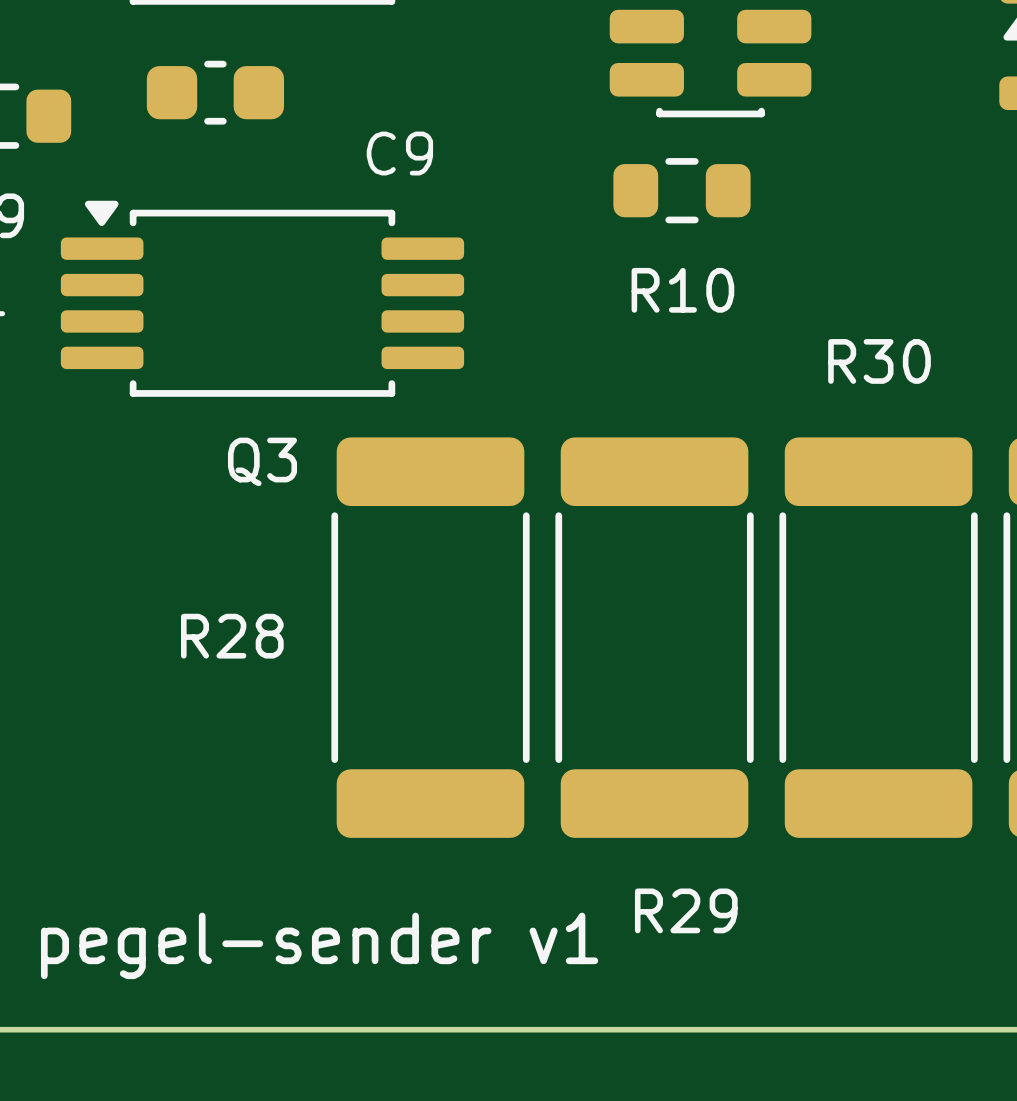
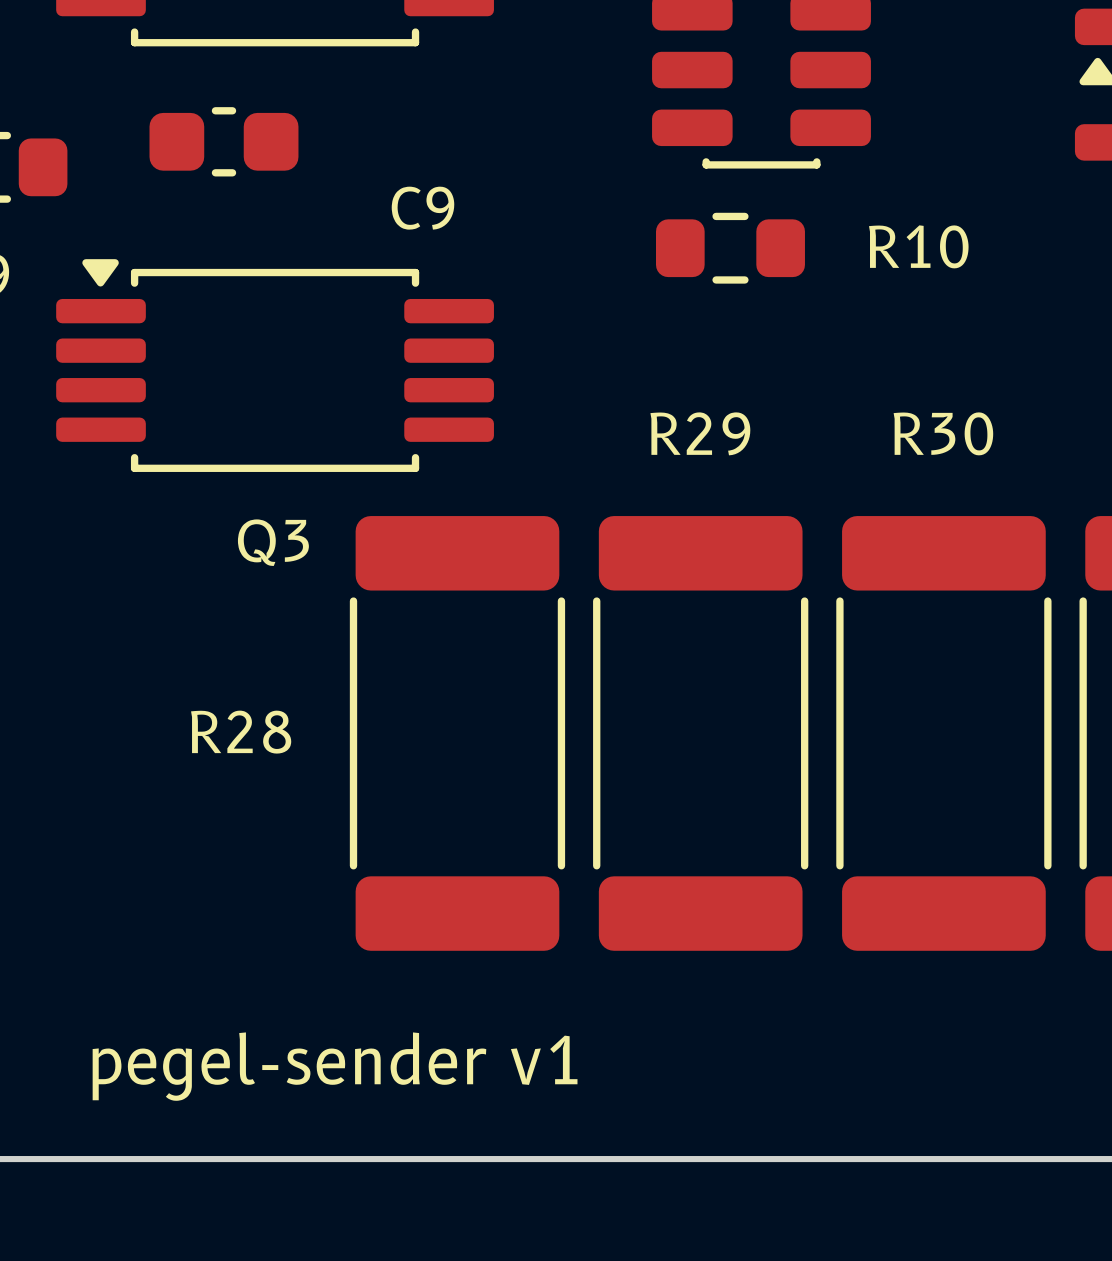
R10 name position: R10 (682, 290) -> R10 (918, 246)
R29 name position: R29 (686, 910) -> R29 (700, 433)

